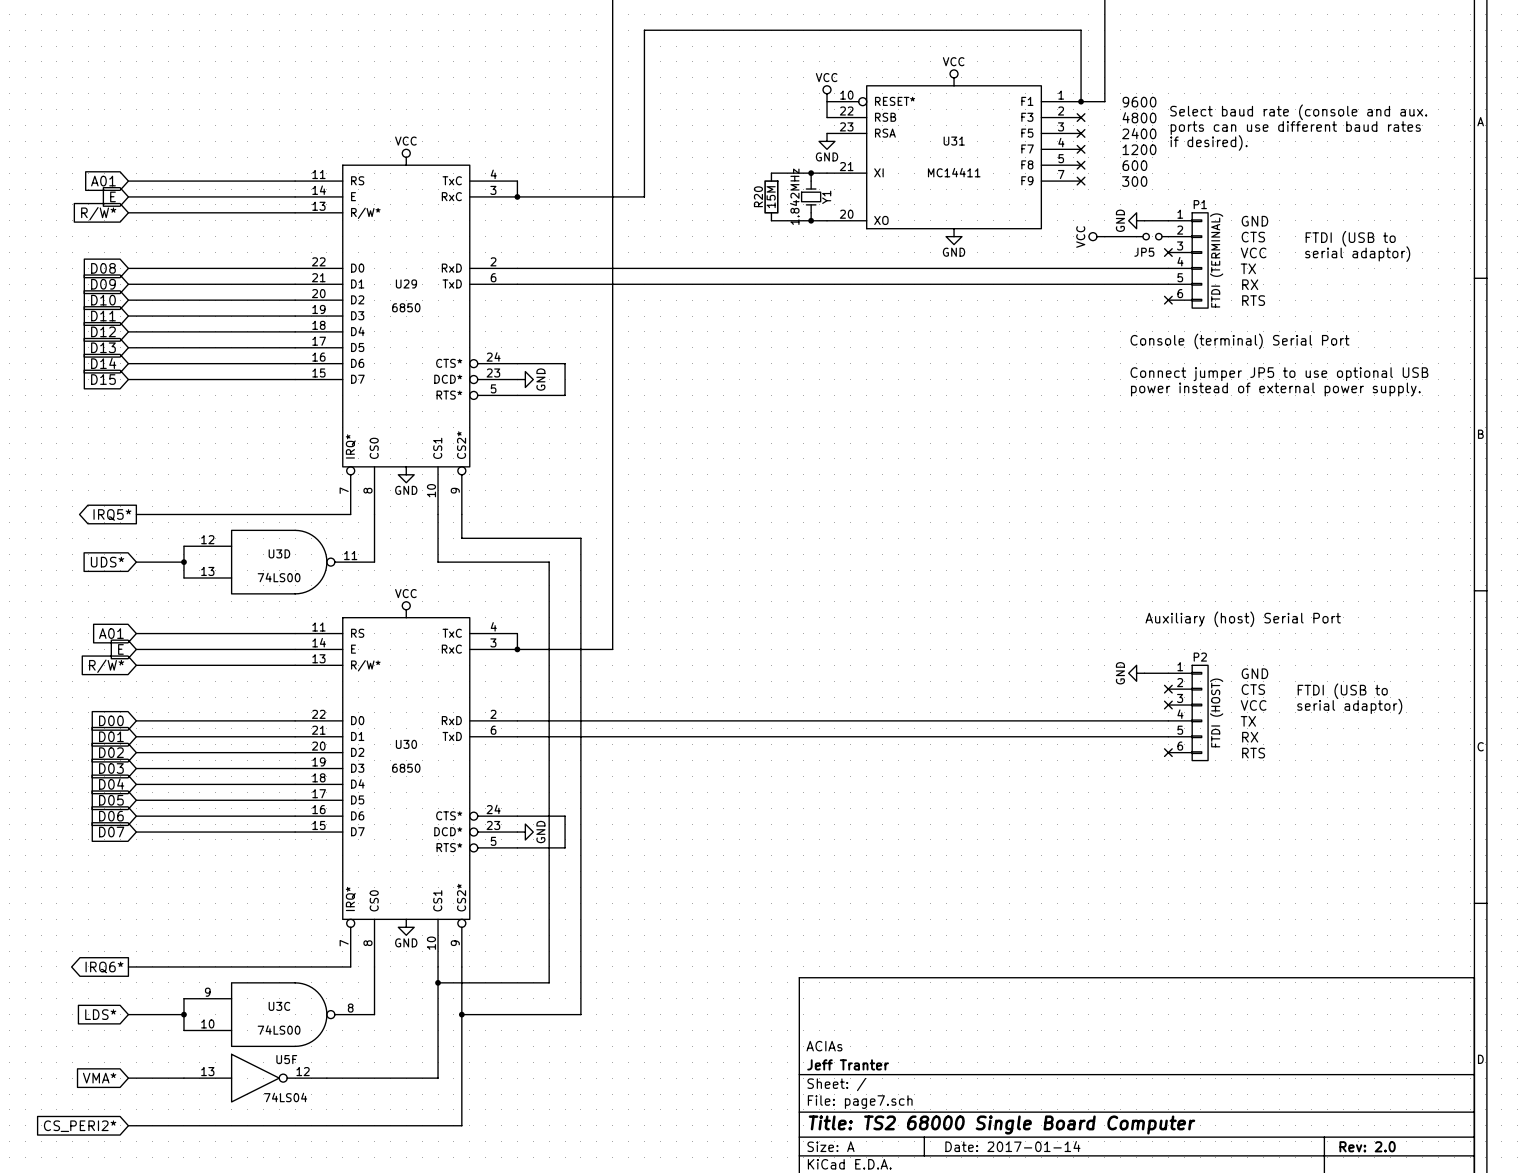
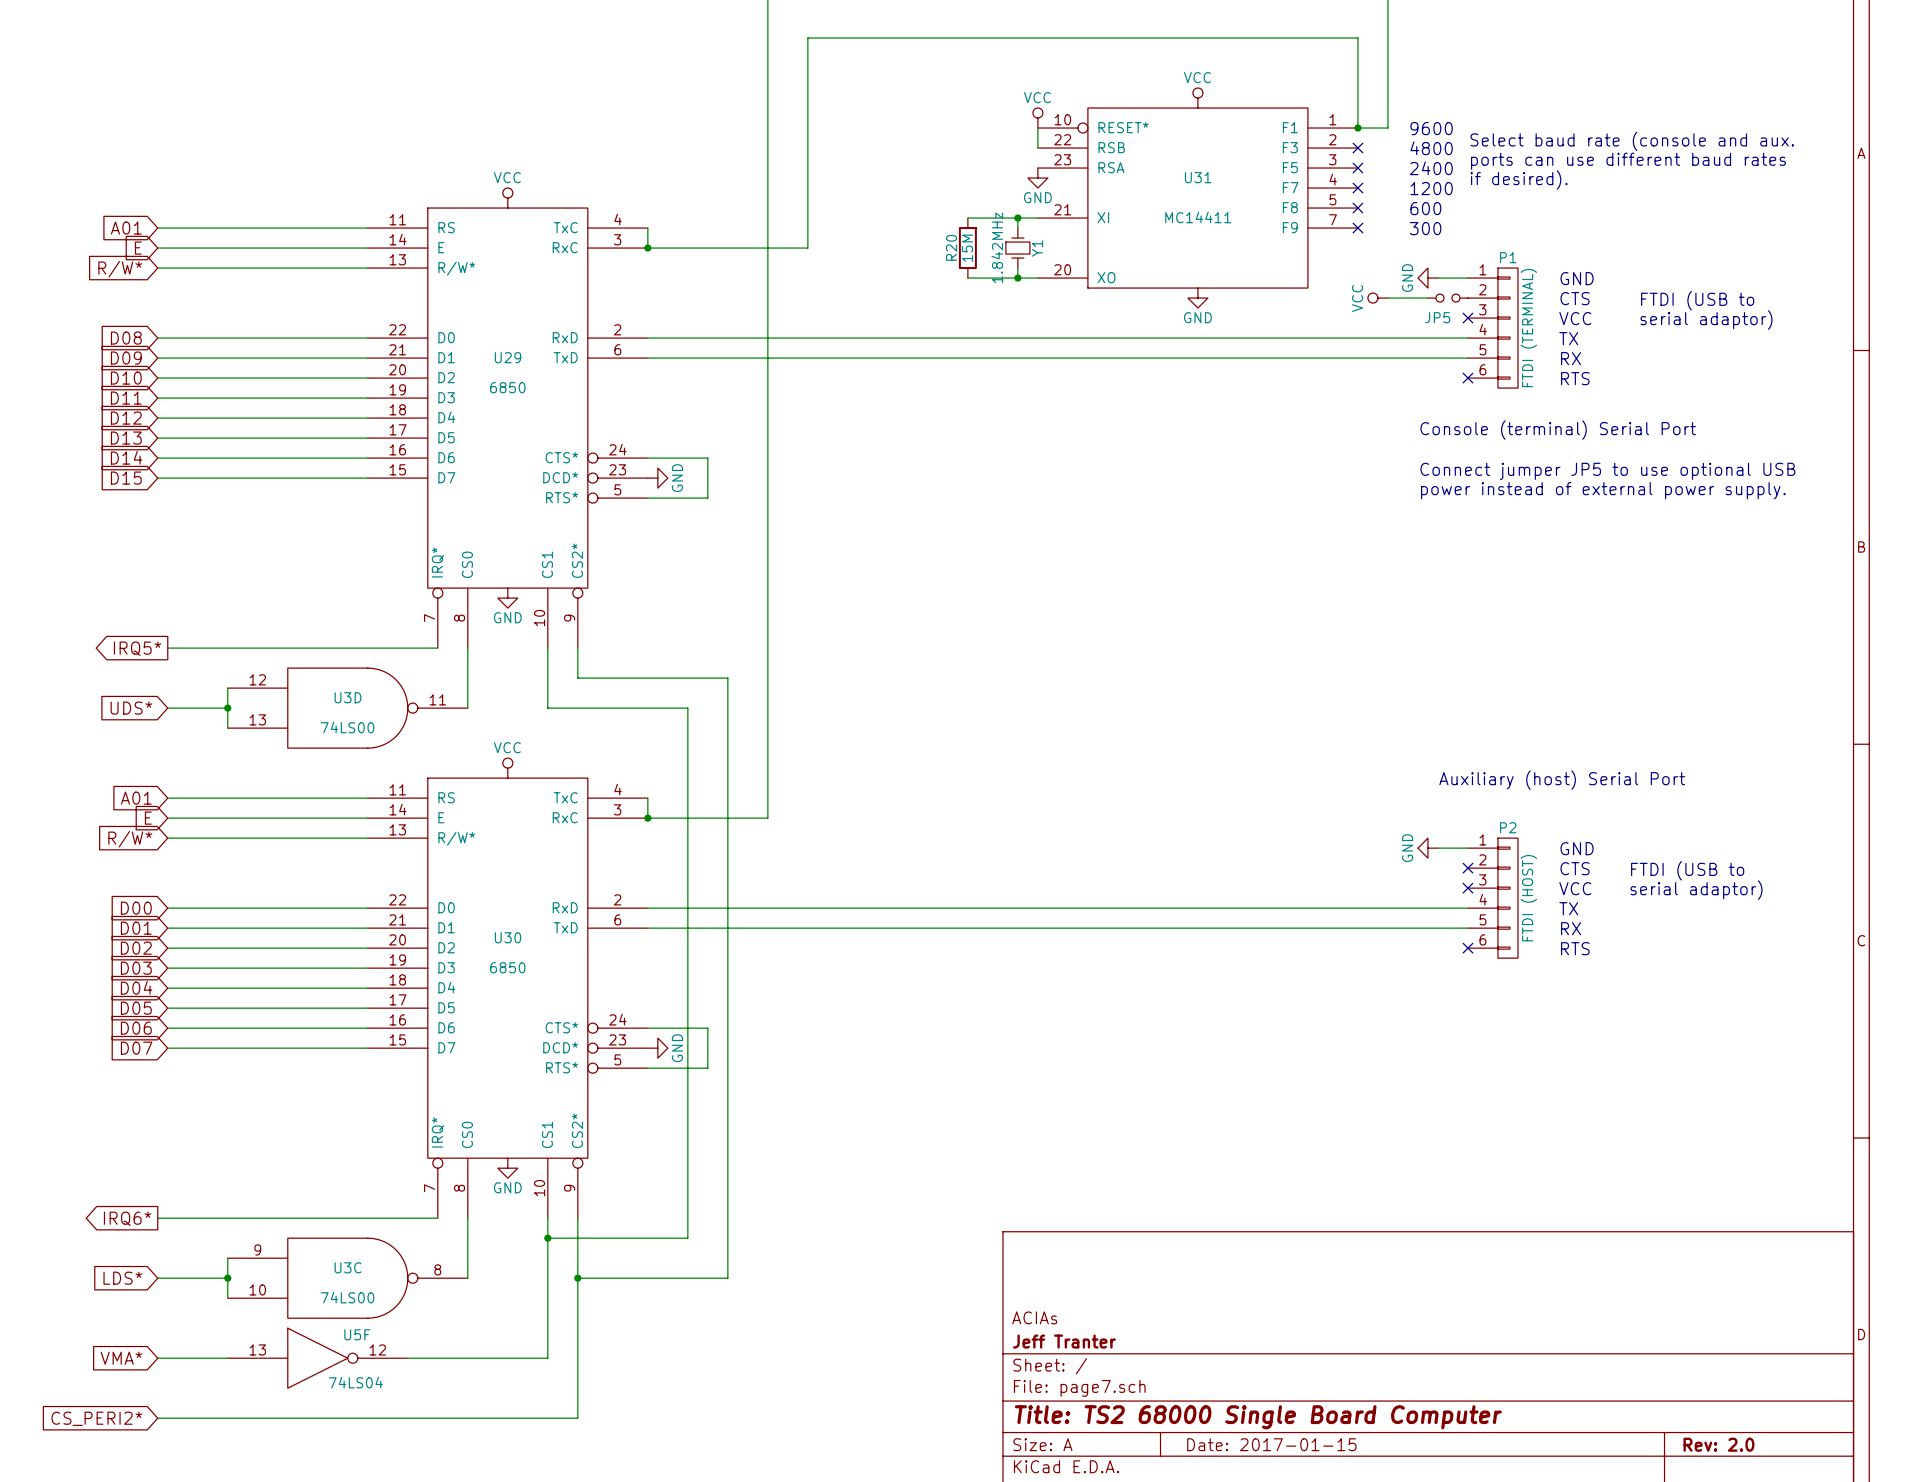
title block: Date: 2017-01-14 (1012, 1146) -> Date: 2017-01-15 (1271, 1444)

